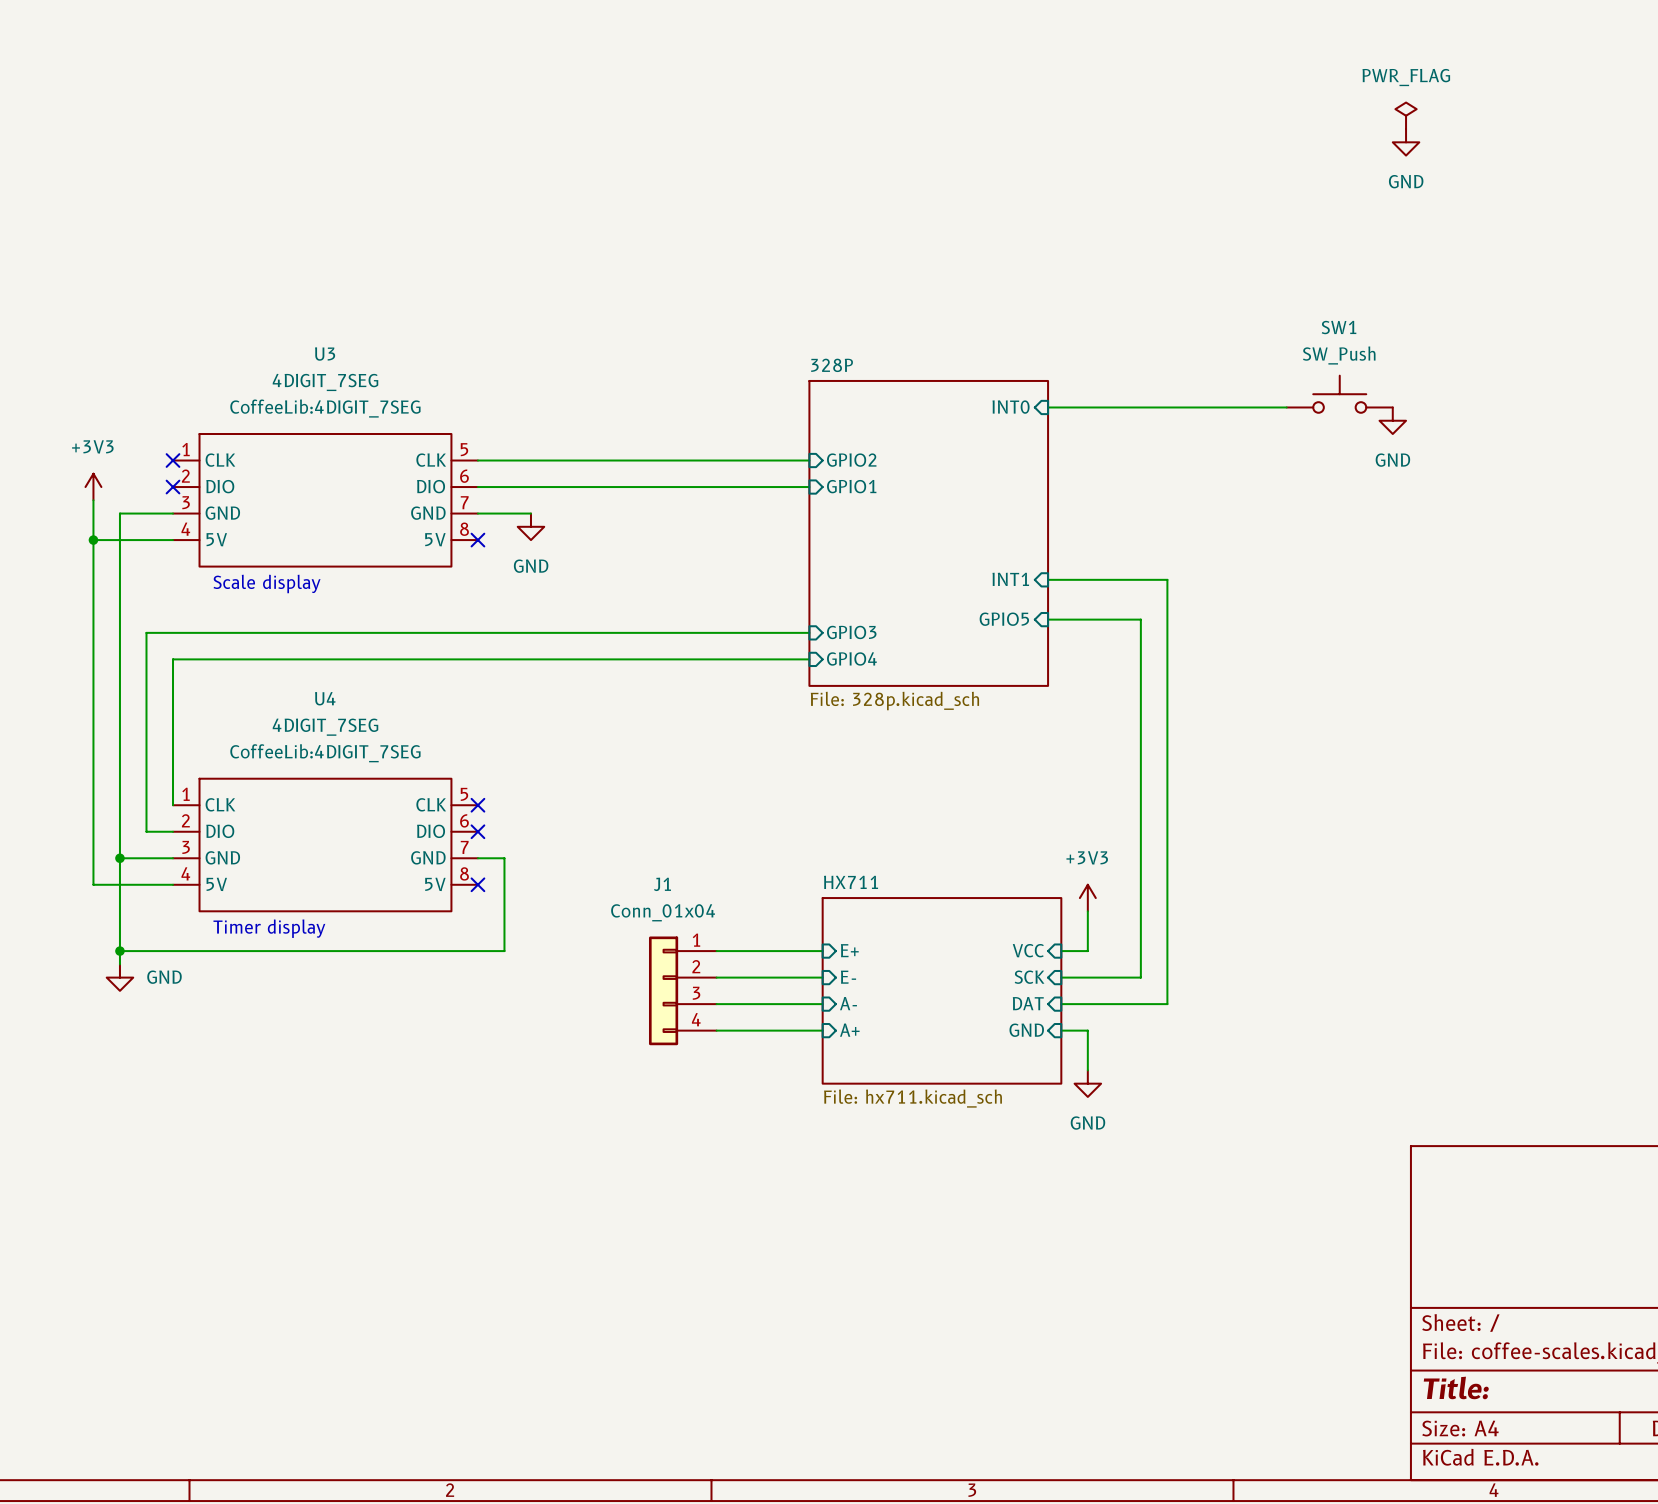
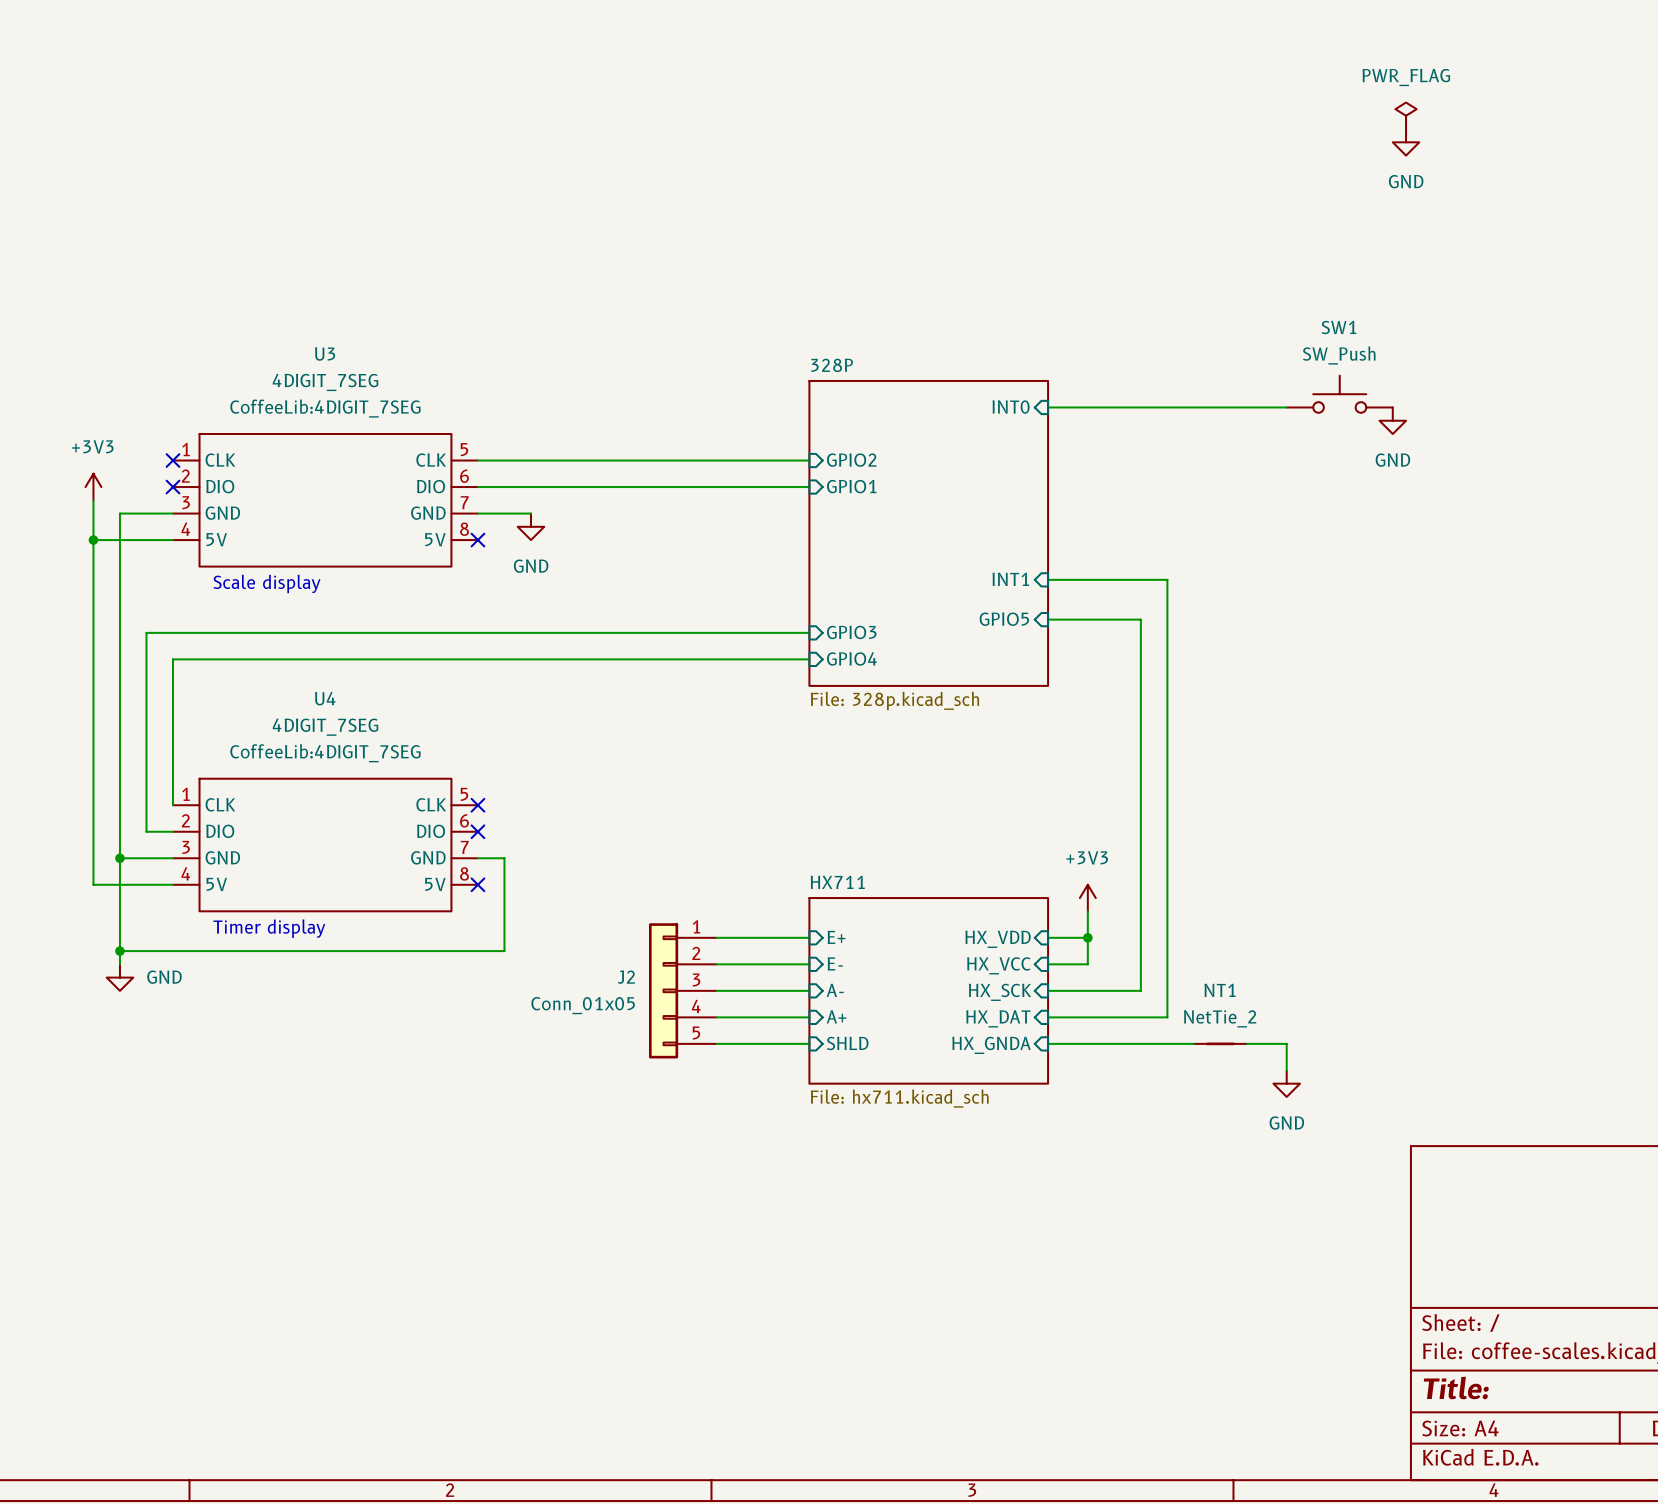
wire: none -> (716, 937) (809, 937)
wire: none -> (1048, 937) (1087, 937)
junction: none -> (1087, 937)
sheet pin: none -> HX_VDD (998, 939)
sheet pin position: E+ (849, 950) -> E+ (836, 937)
sheet pin: VCC (1028, 950) -> HX_VCC (998, 965)
wire: (716, 951) (822, 951) -> none
wire: (1061, 951) (1087, 951) -> (1048, 964) (1087, 964) (1087, 951)
wire: none -> (716, 964) (809, 964)
wire: (716, 977) (822, 977) -> none
sheet pin position: E- (848, 977) -> E- (835, 963)
sheet pin: SCK (1029, 977) -> HX_SCK (1000, 992)
wire: (1061, 977) (1140, 977) -> (1048, 990) (1140, 990) (1140, 977)
J1: Conn_01x04 (682, 990) -> none
J2: none -> Conn_01x05 (682, 990)
wire: none -> (716, 990) (809, 990)
sheet HX711 position: (941, 990) -> (928, 990)
sheet pin position: A- (848, 1003) -> A- (835, 990)
sheet pin: DAT (1028, 1003) -> HX_DAT (998, 1018)
wire: (716, 1004) (822, 1004) -> none
wire: (1061, 1004) (1167, 1004) -> (1048, 1017) (1167, 1017) (1167, 1004)
wire: none -> (716, 1017) (809, 1017)
wire: (716, 1030) (822, 1030) -> none
sheet pin position: A+ (849, 1030) -> A+ (836, 1016)
sheet pin: GND (1026, 1030) -> none
wire: (1061, 1030) (1087, 1030) (1087, 1070) -> none
wire: none -> (716, 1043) (809, 1043)
sheet pin: none -> SHLD (847, 1043)
wire: none -> (1048, 1043) (1193, 1043)
NT1: none -> NetTie_2 (1220, 1043)
wire: none -> (1246, 1043) (1286, 1043) (1286, 1070)
sheet pin: none -> HX_GNDA (991, 1045)
power symbol position: GND (1087, 1083) -> GND (1286, 1083)

